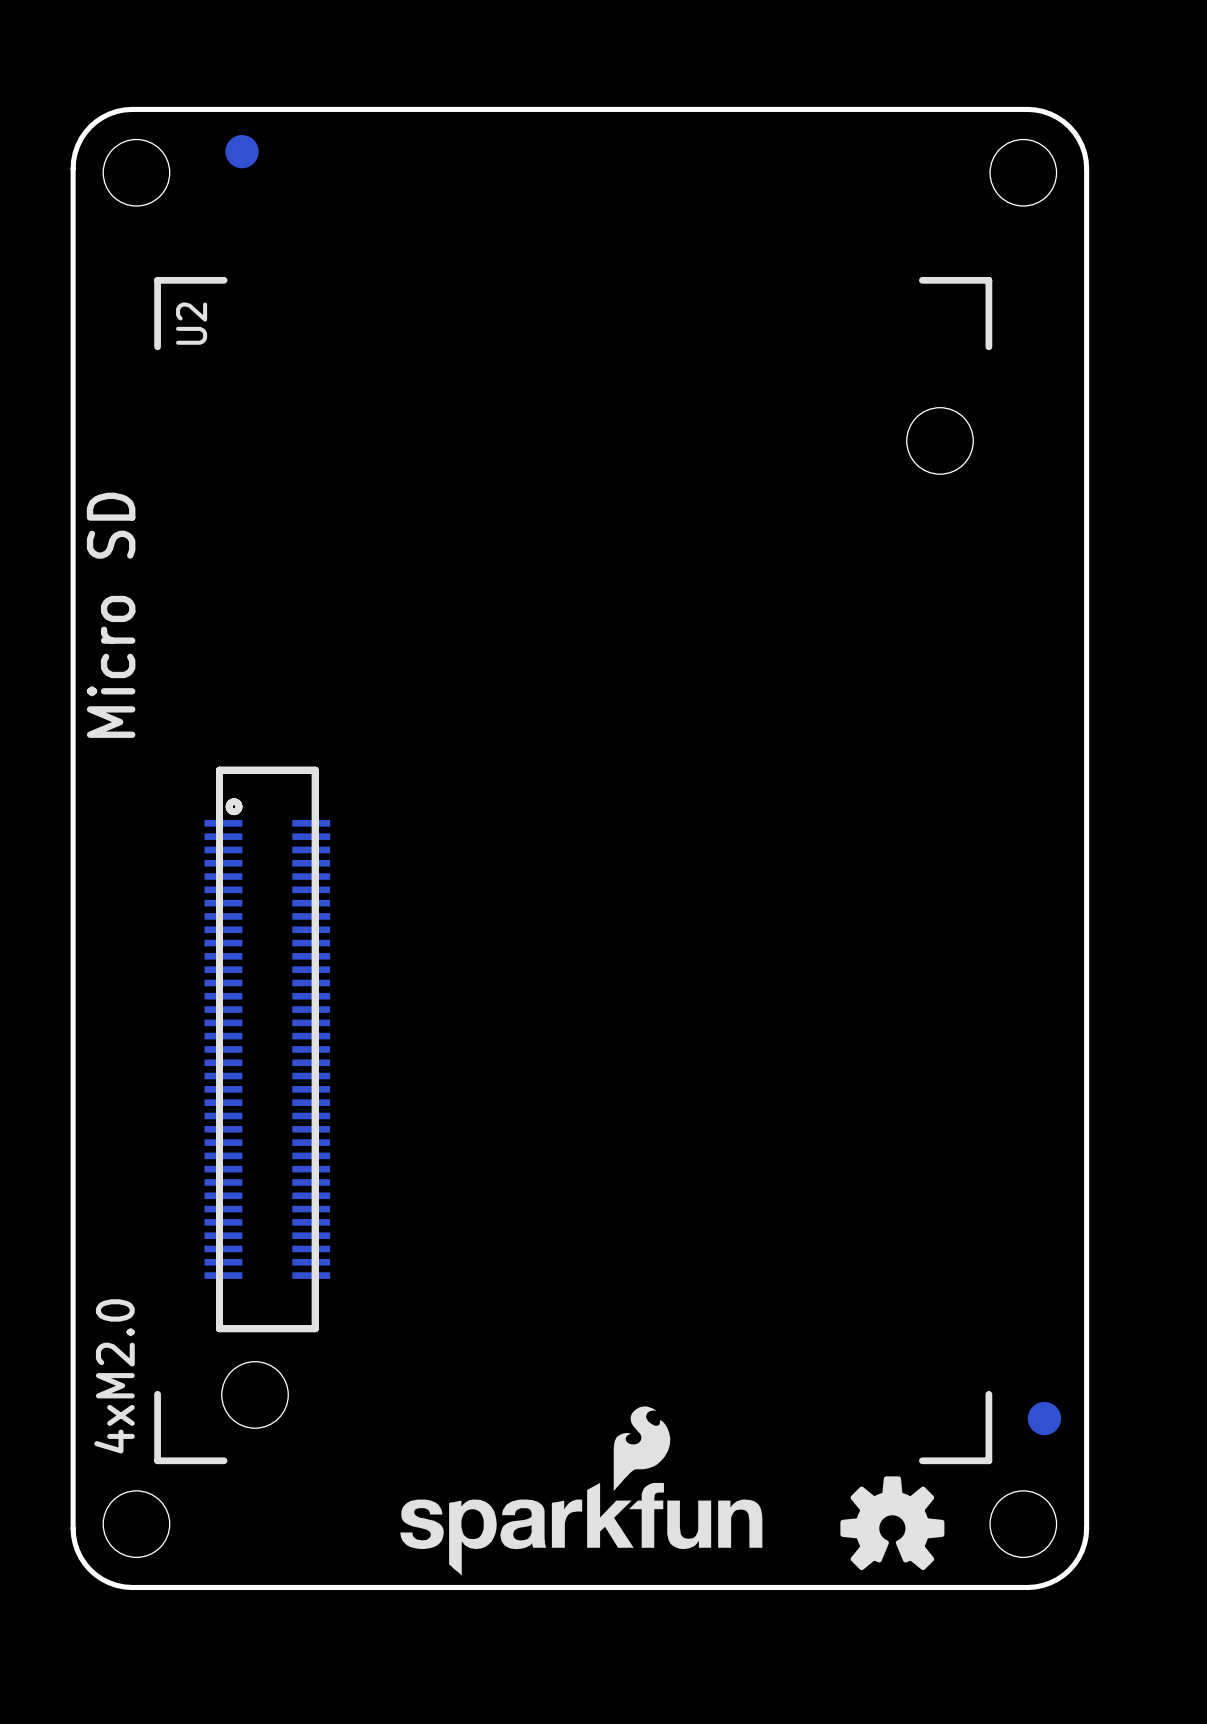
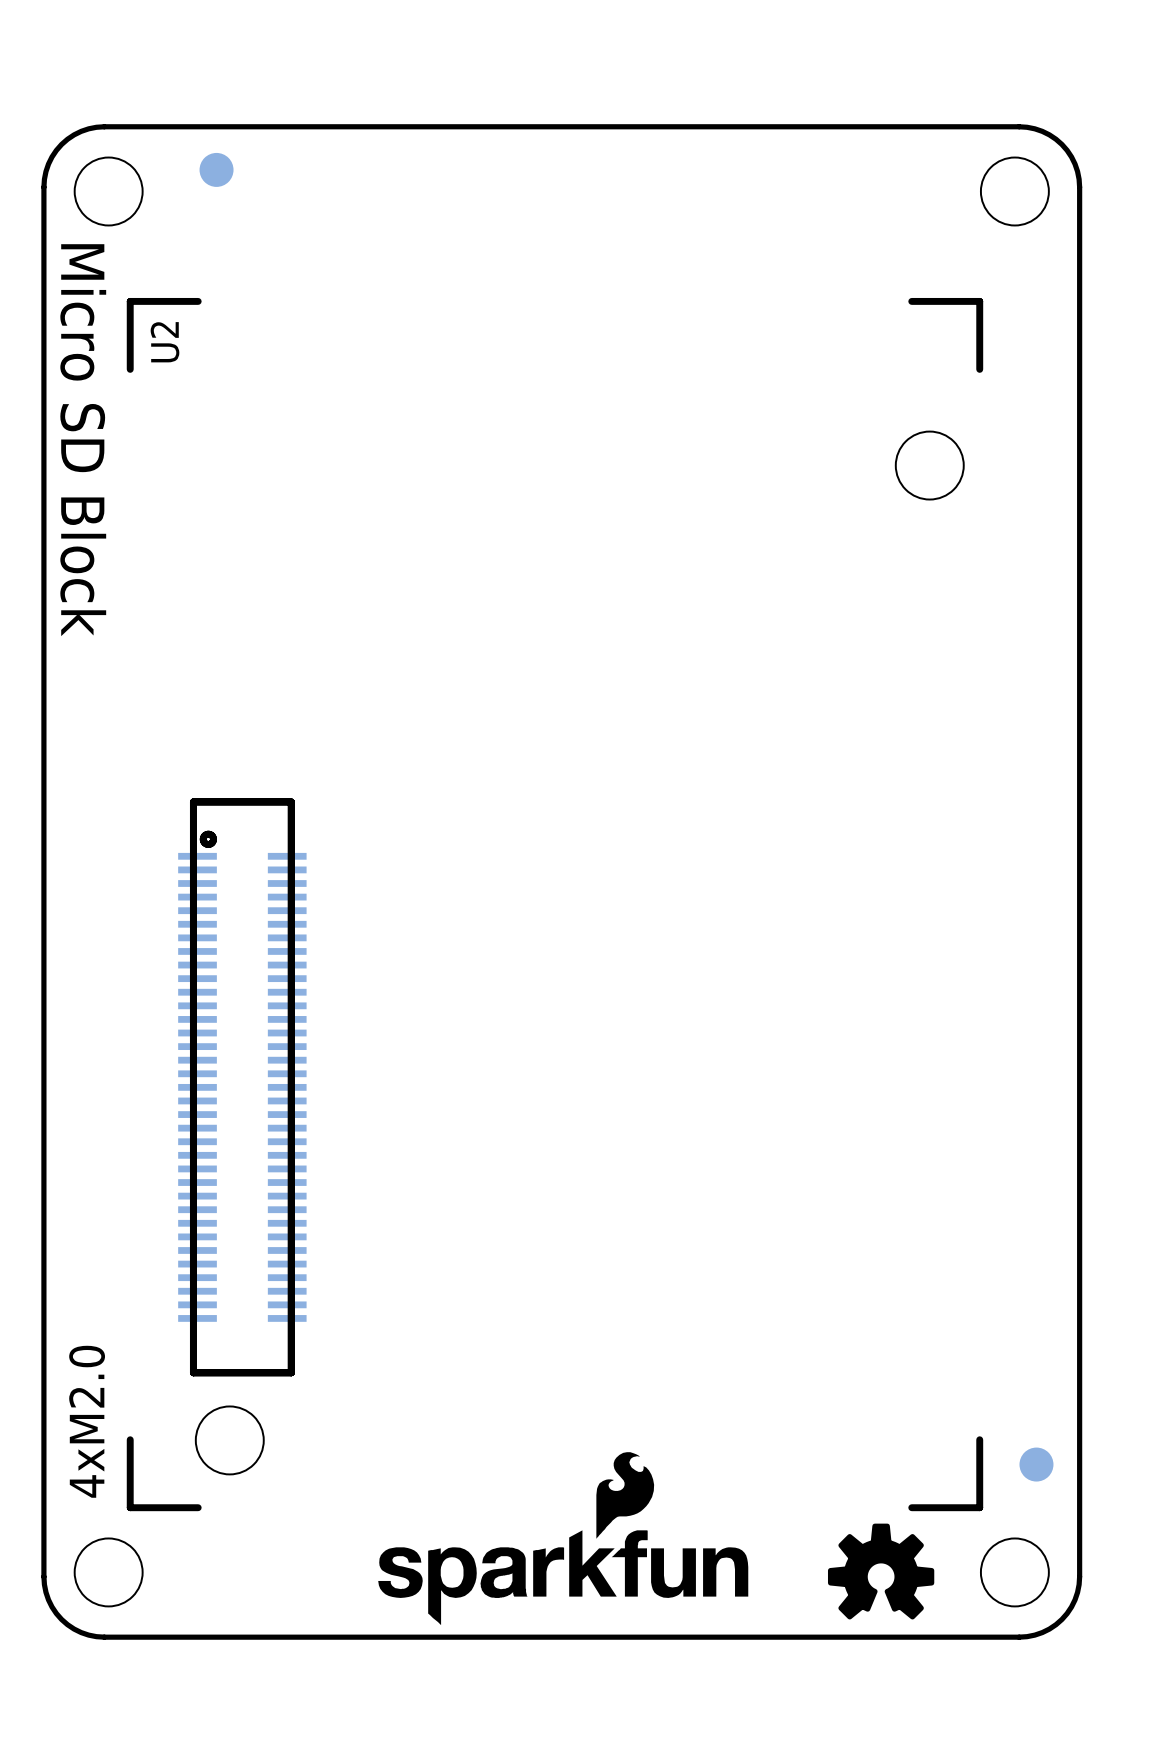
text: Micro SD (111, 615) -> Micro SD Block (83, 440)

